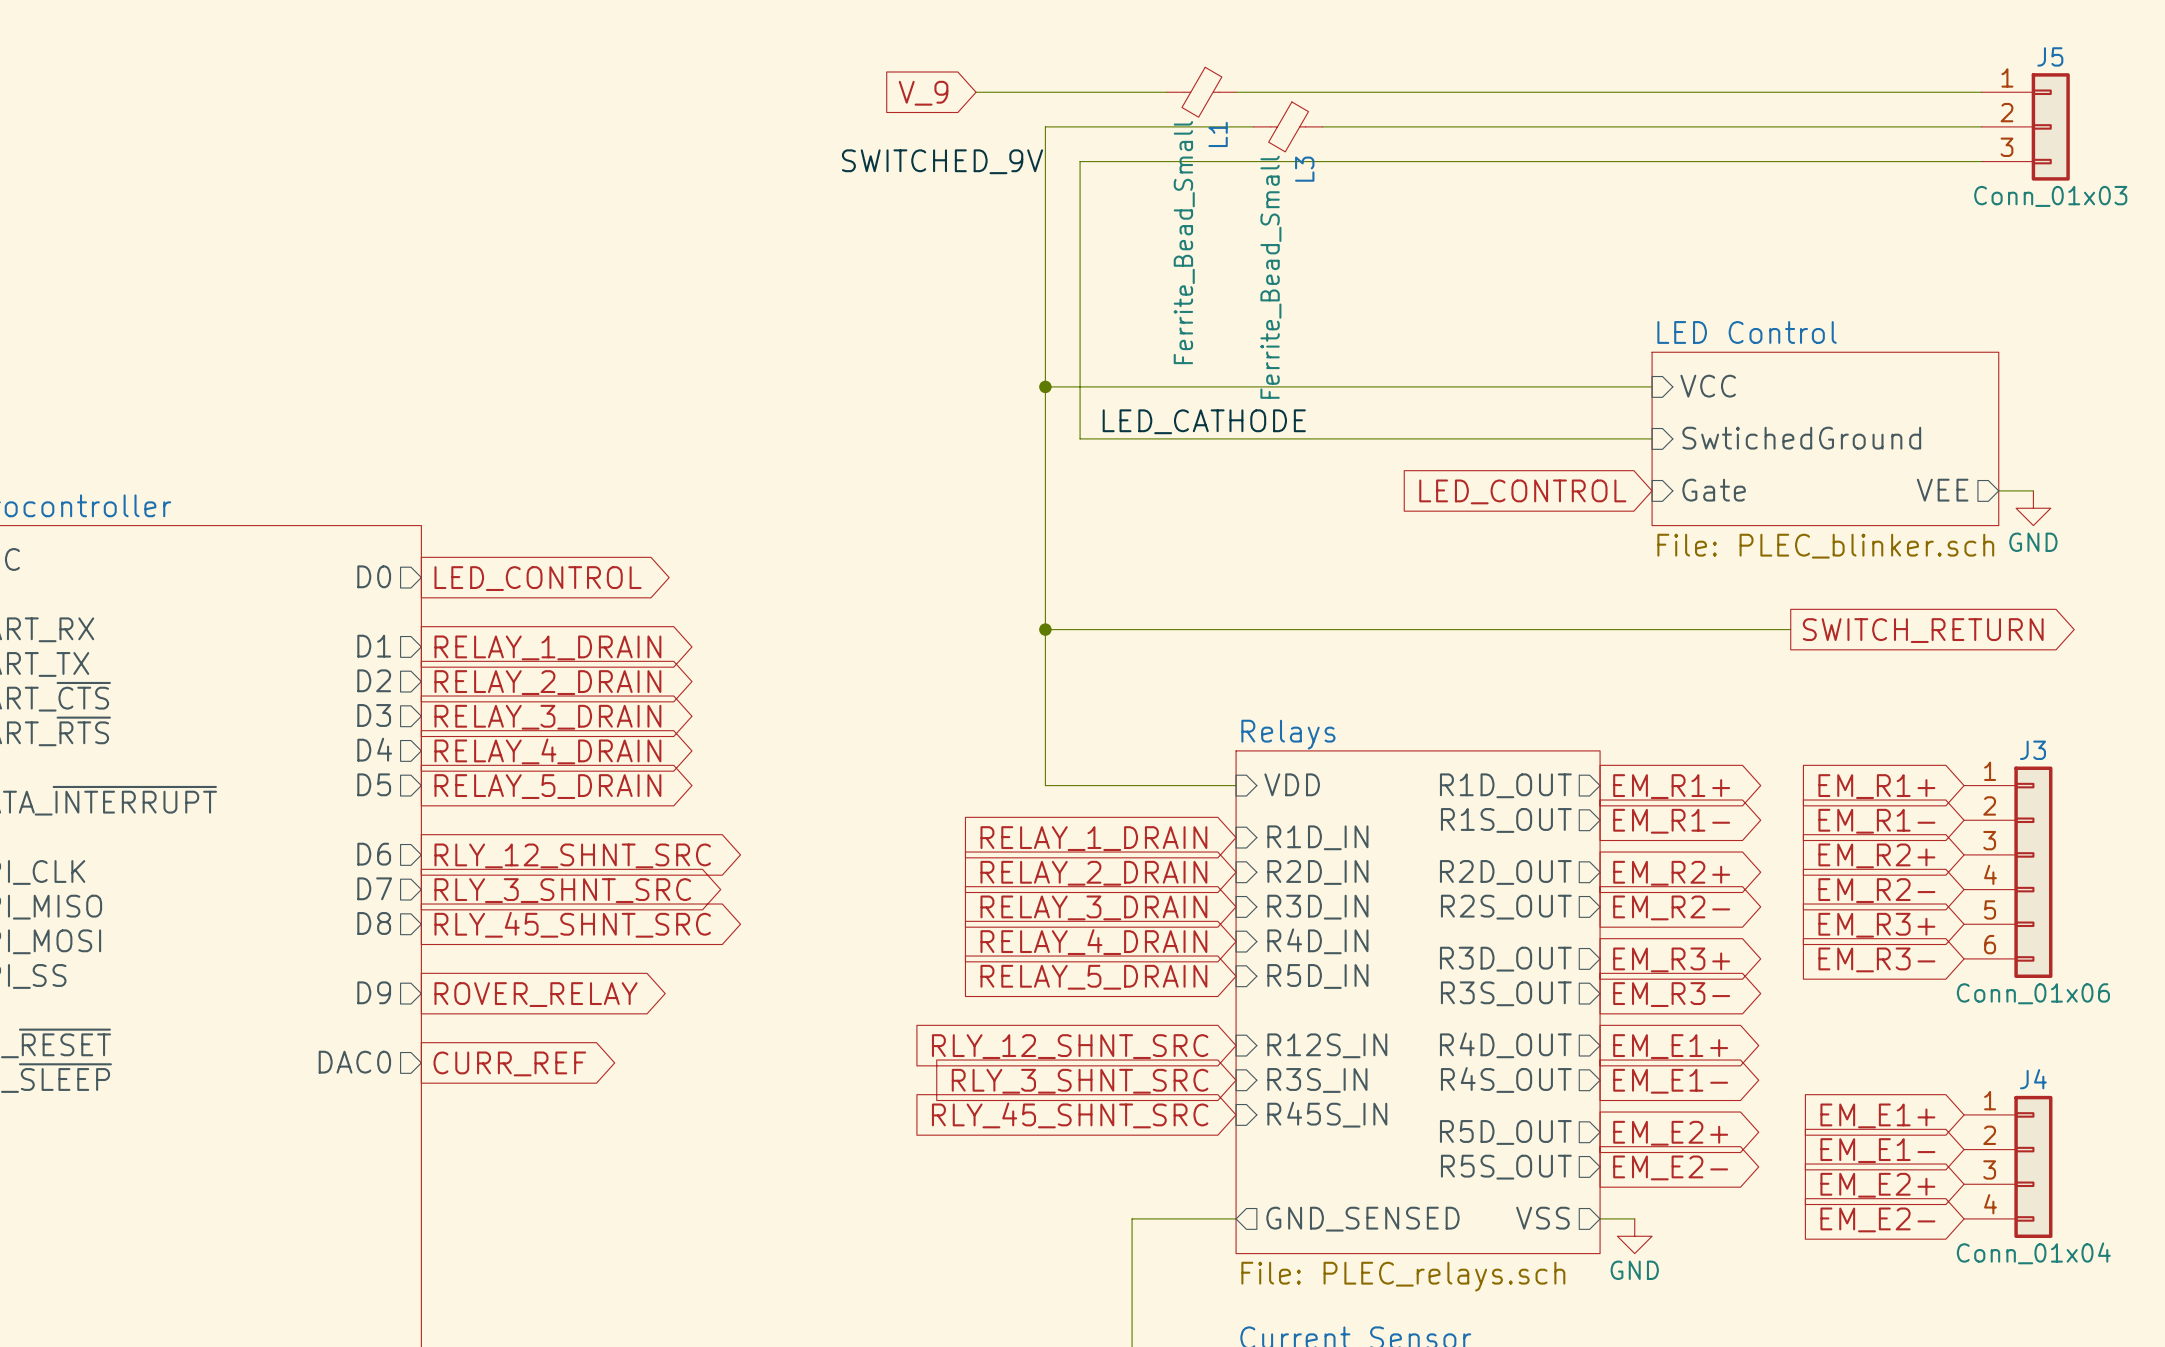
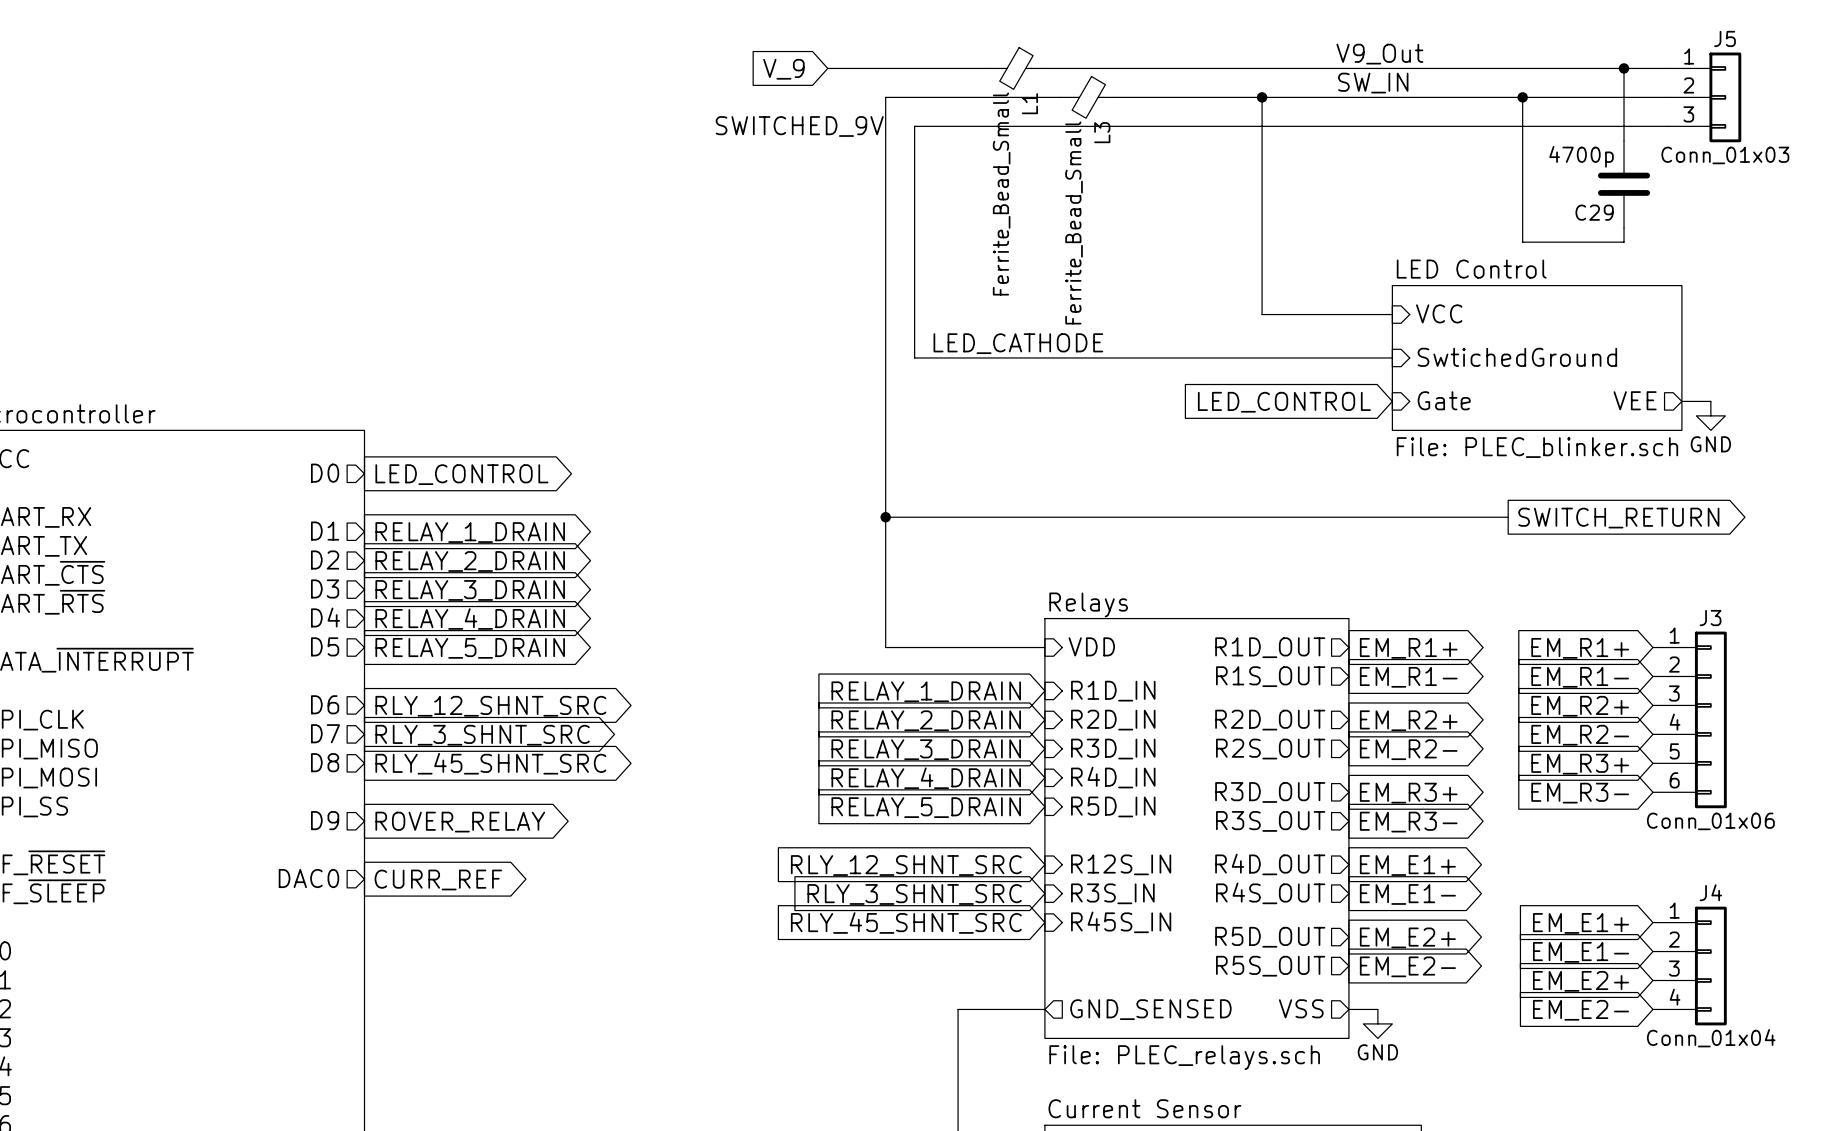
label: none -> V9_Out (1379, 54)
wire: none -> (1624, 68) (1624, 140)
junction: none -> (1624, 68)
label: none -> SW_IN (1373, 83)
junction: none -> (1262, 97)
wire: none -> (1522, 97) (1522, 242) (1624, 242) (1624, 227)
junction: none -> (1522, 97)
C29: none -> 4700p (1624, 184)
wire: (1045, 386) (1496, 386) -> (1262, 97) (1262, 314)
junction: (1045, 386) -> none

